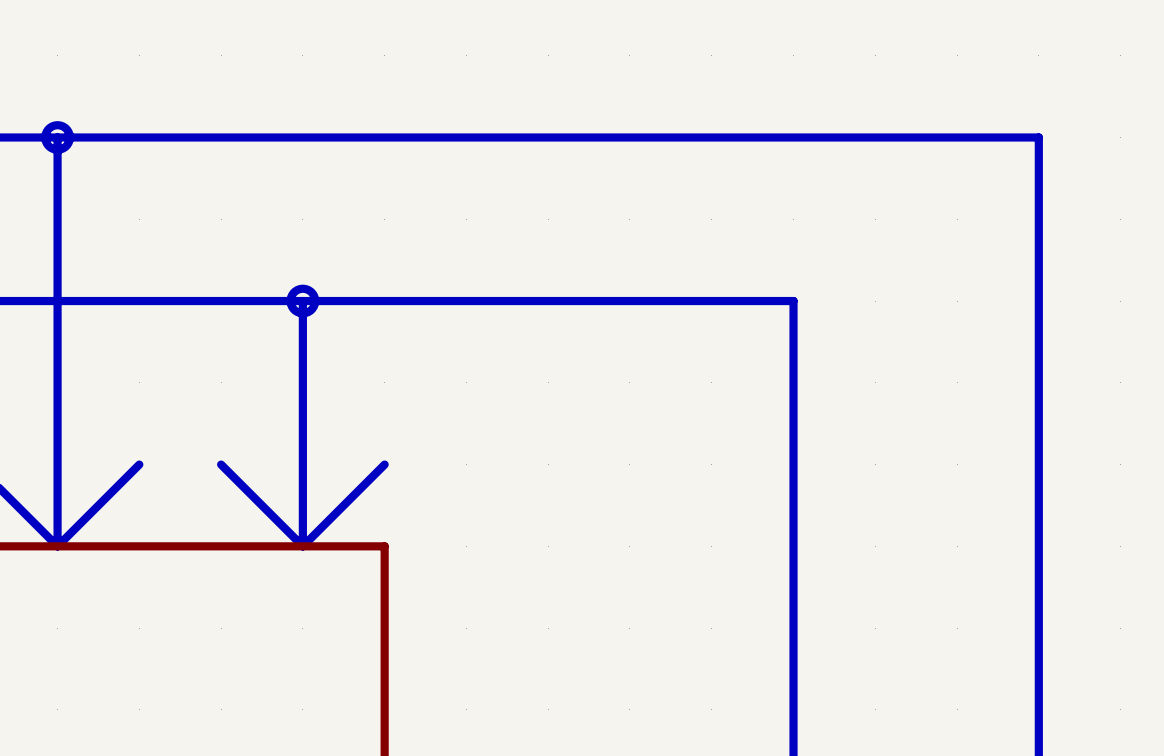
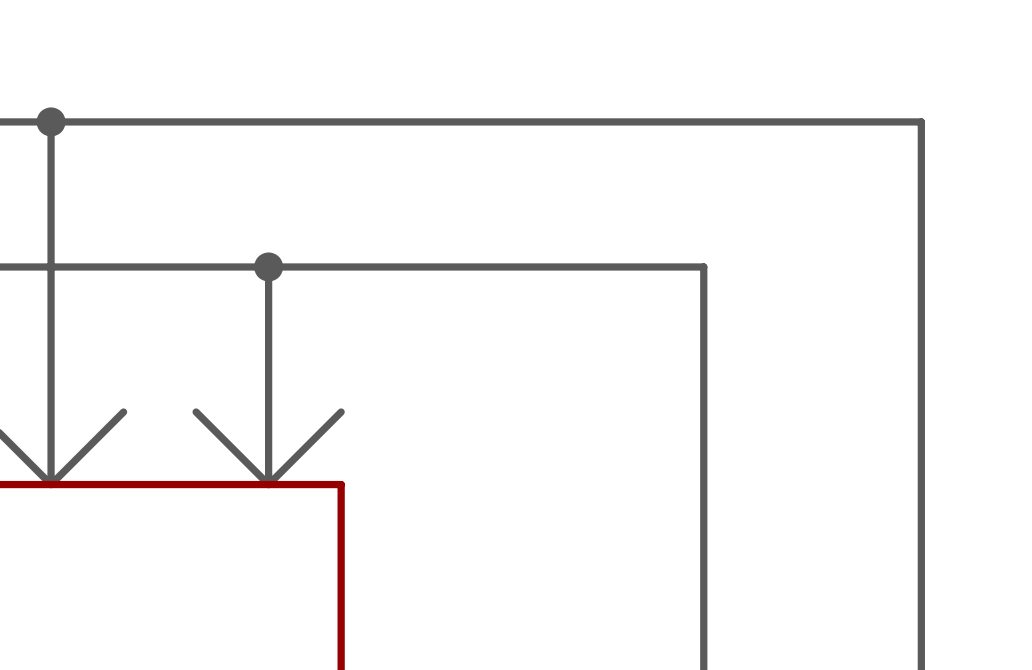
drawing: [41, 121, 74, 154] -> none
part: none -> (51, 121)
drawing: [286, 284, 320, 318] -> none
part: none -> (268, 266)

